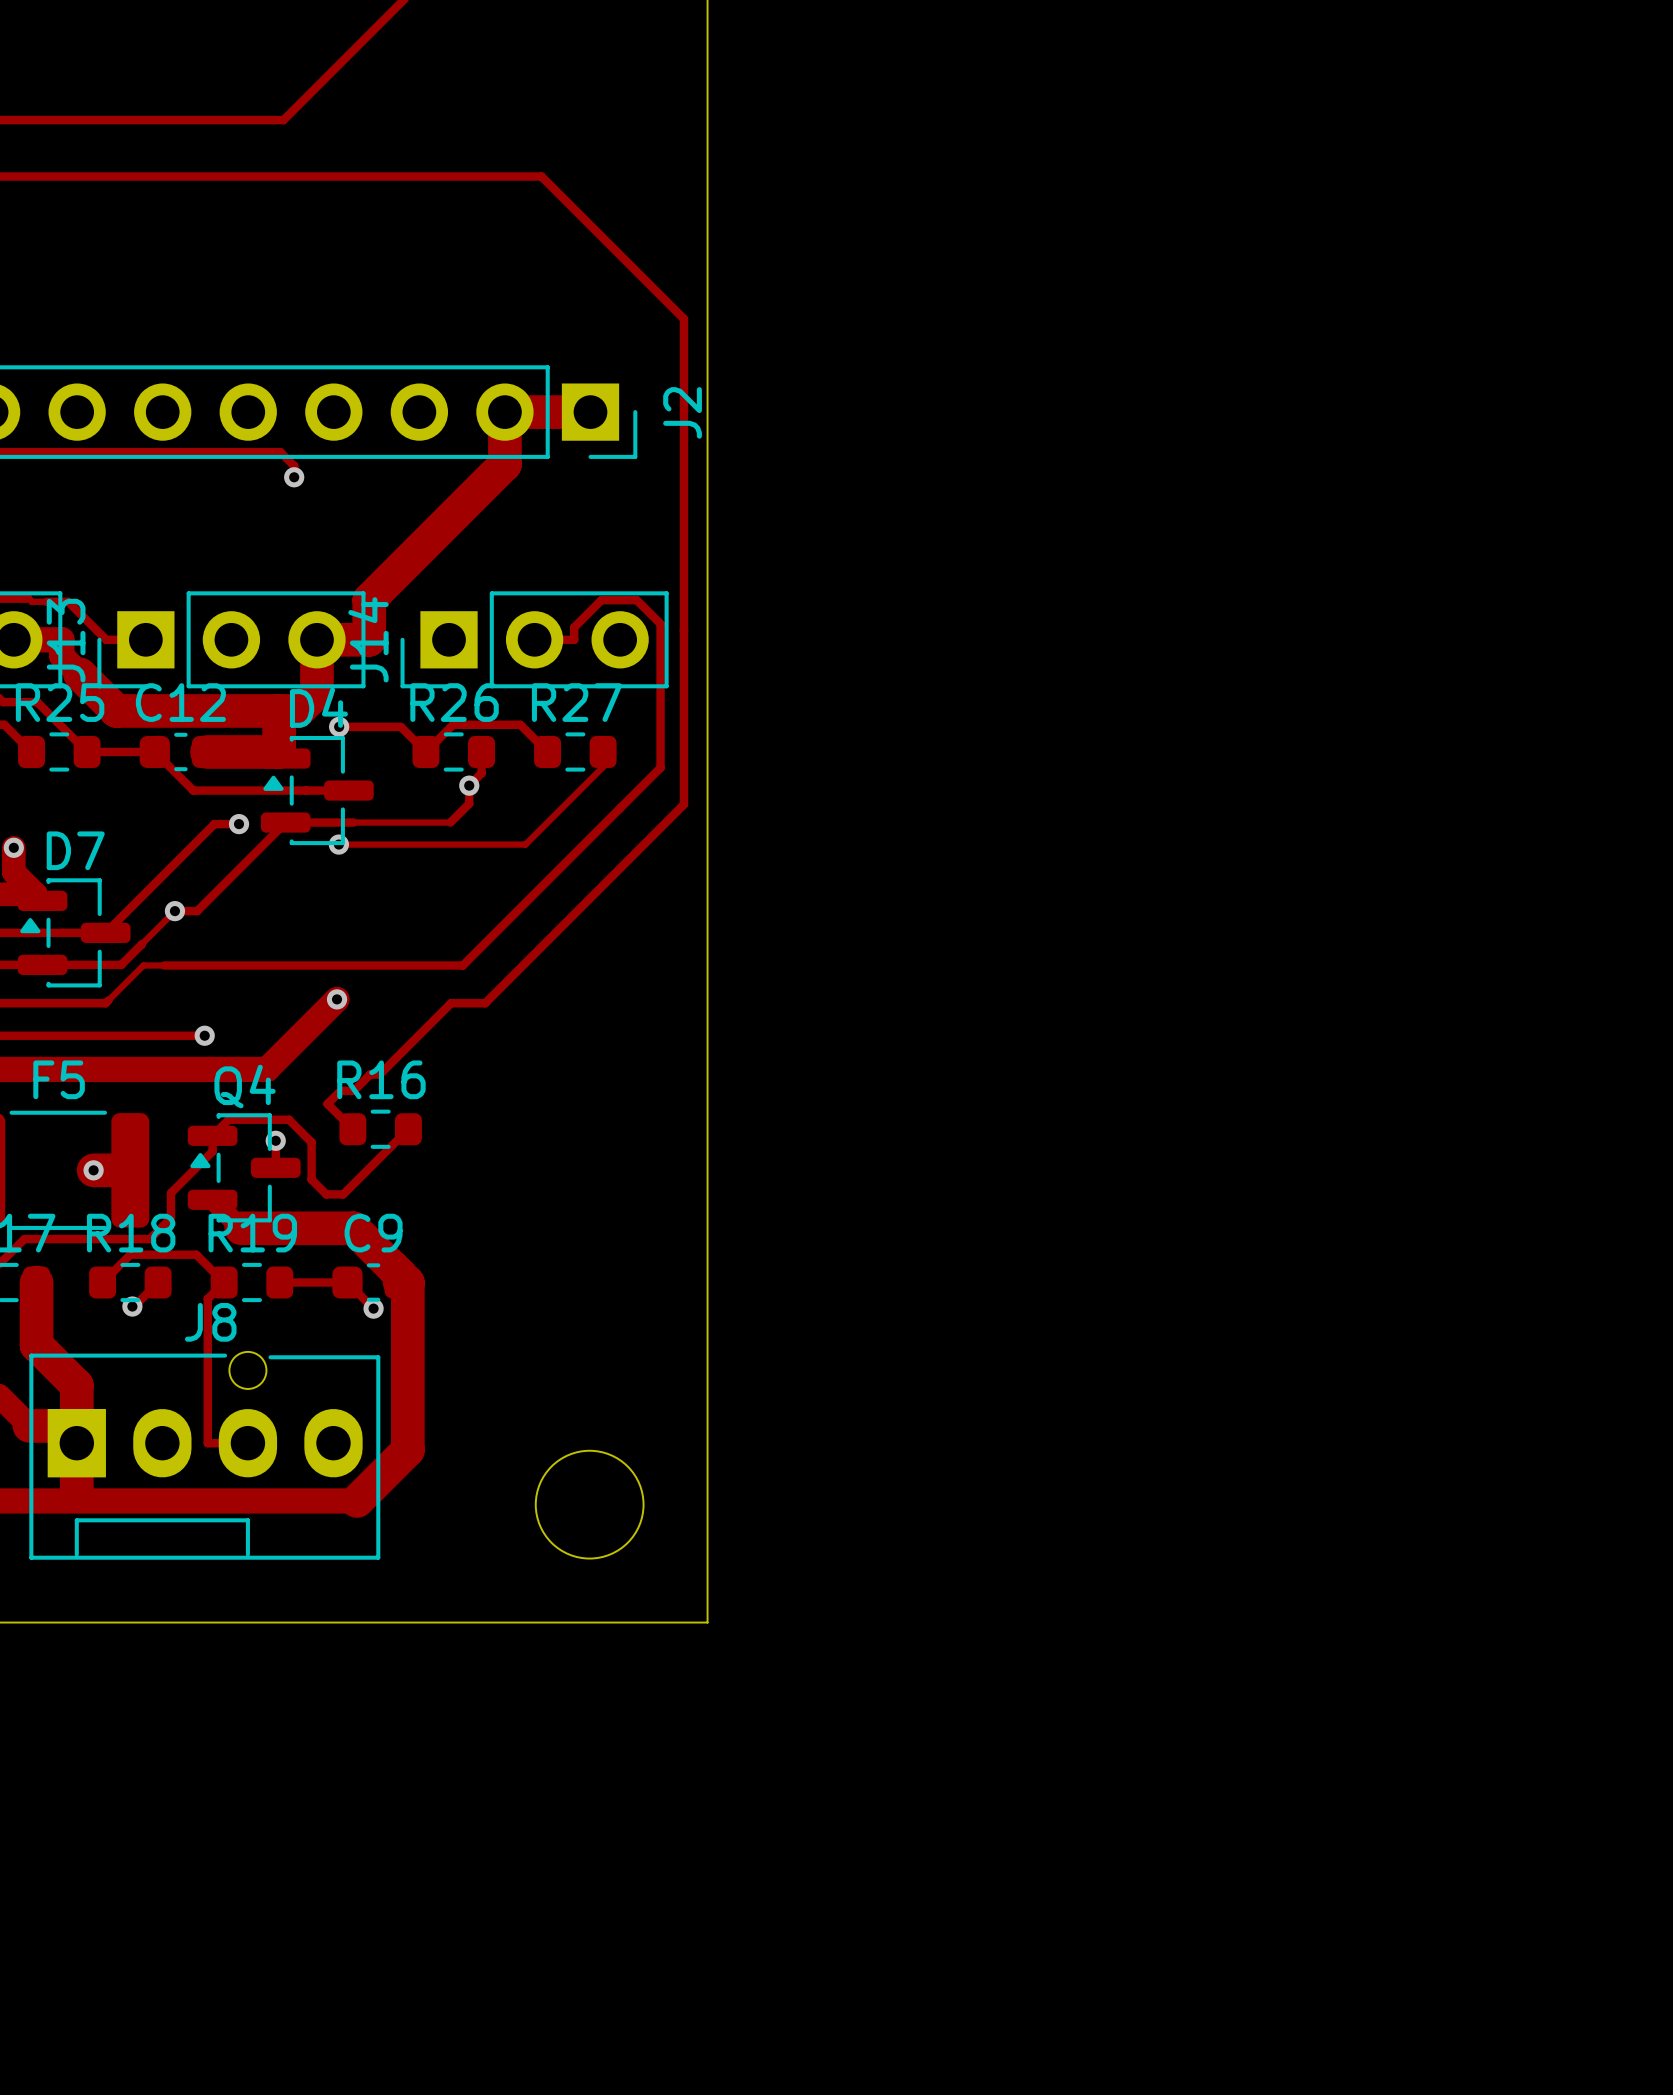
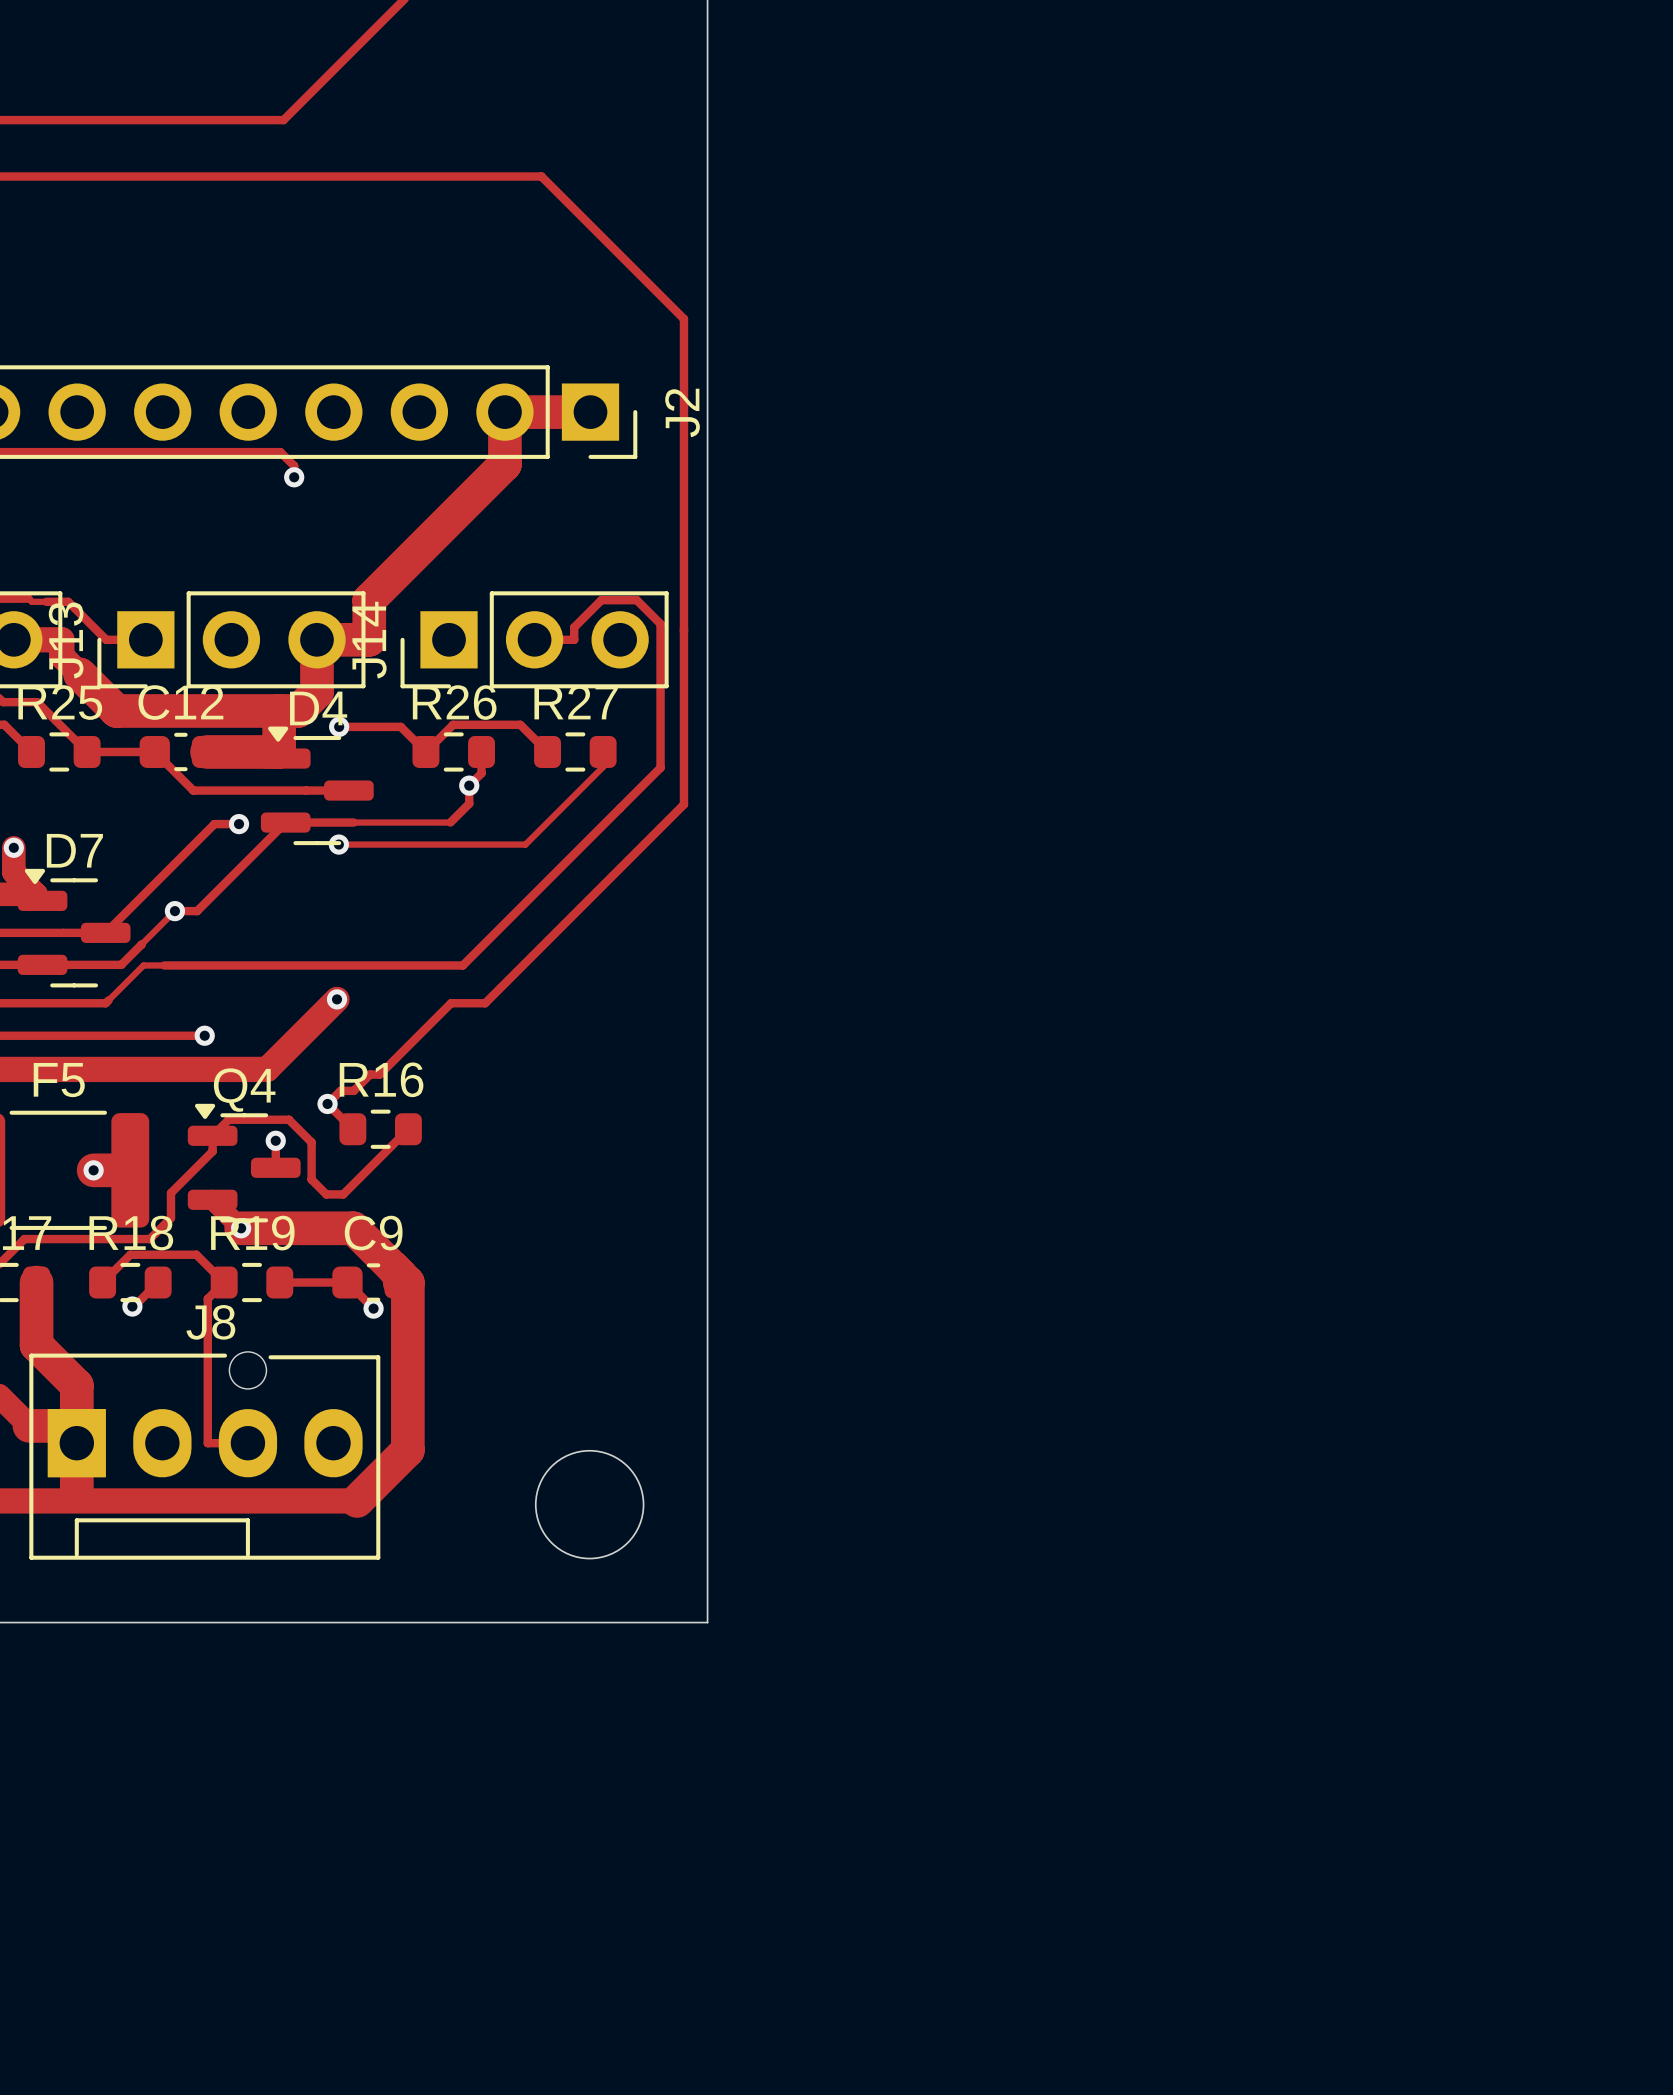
D4 footprint: [260, 735, 374, 846] -> [260, 726, 374, 846]
D7 footprint: [17, 878, 131, 988] -> [17, 868, 131, 988]
via: none -> (327, 1103)
Q4 footprint: [187, 1113, 301, 1223] -> [187, 1103, 301, 1223]
via: none -> (241, 1228)

